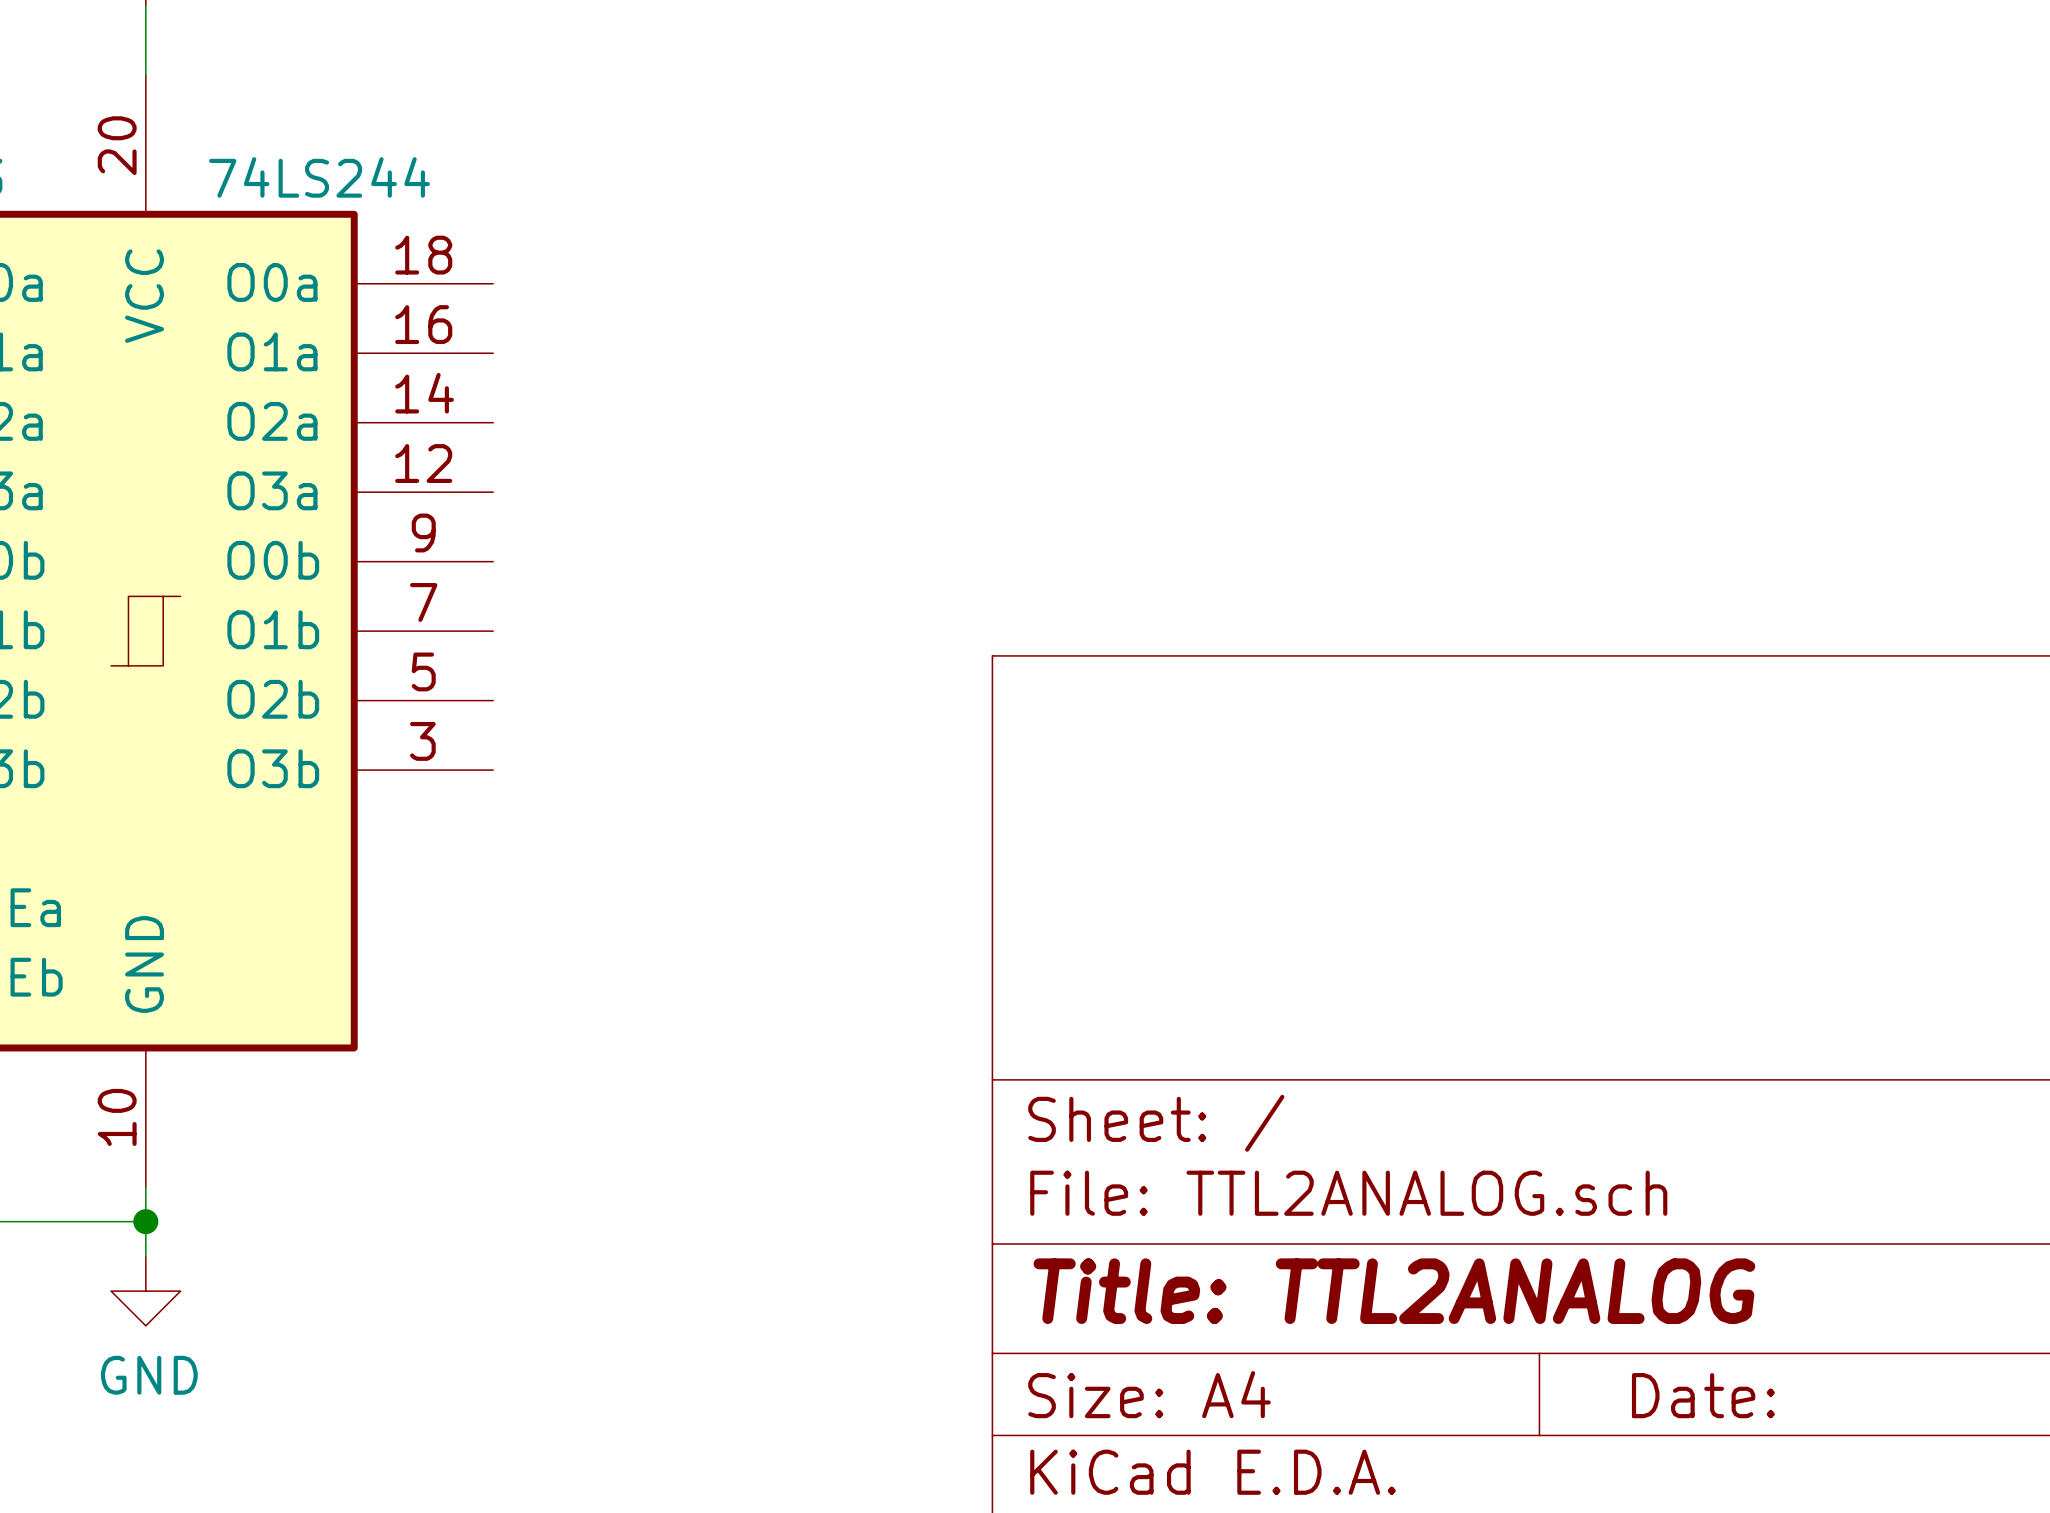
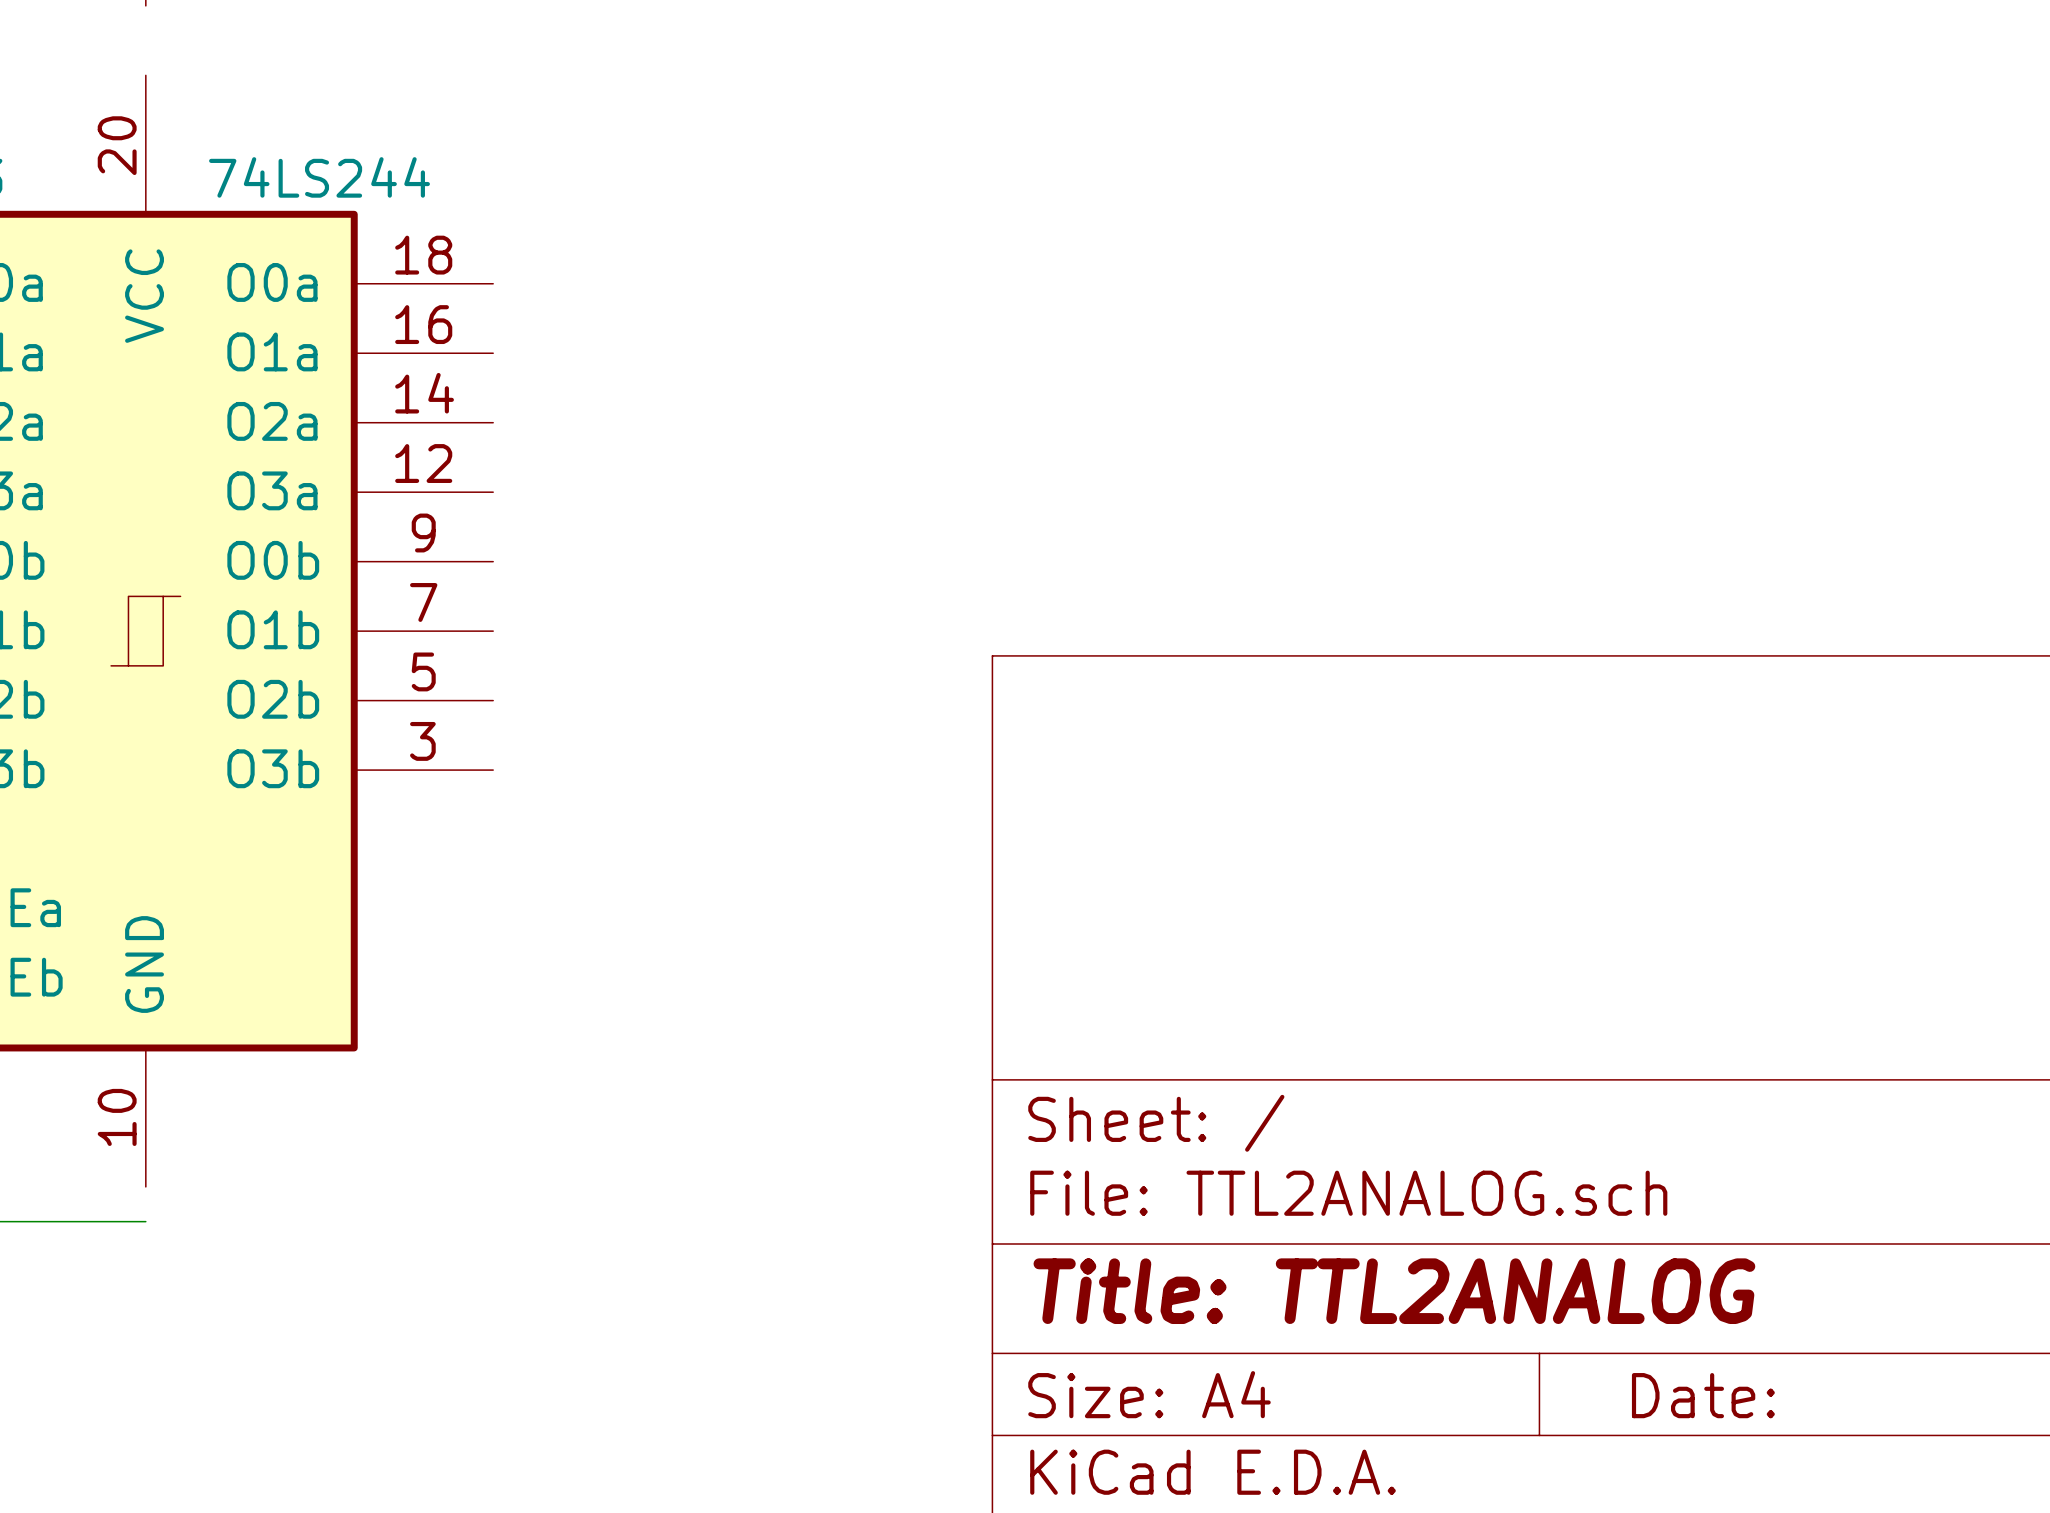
wire: (145, 5) (145, 75) -> none
wire: (145, 1186) (145, 1256) -> none
junction: (145, 1221) -> none
power symbol: GND (145, 1291) -> none

